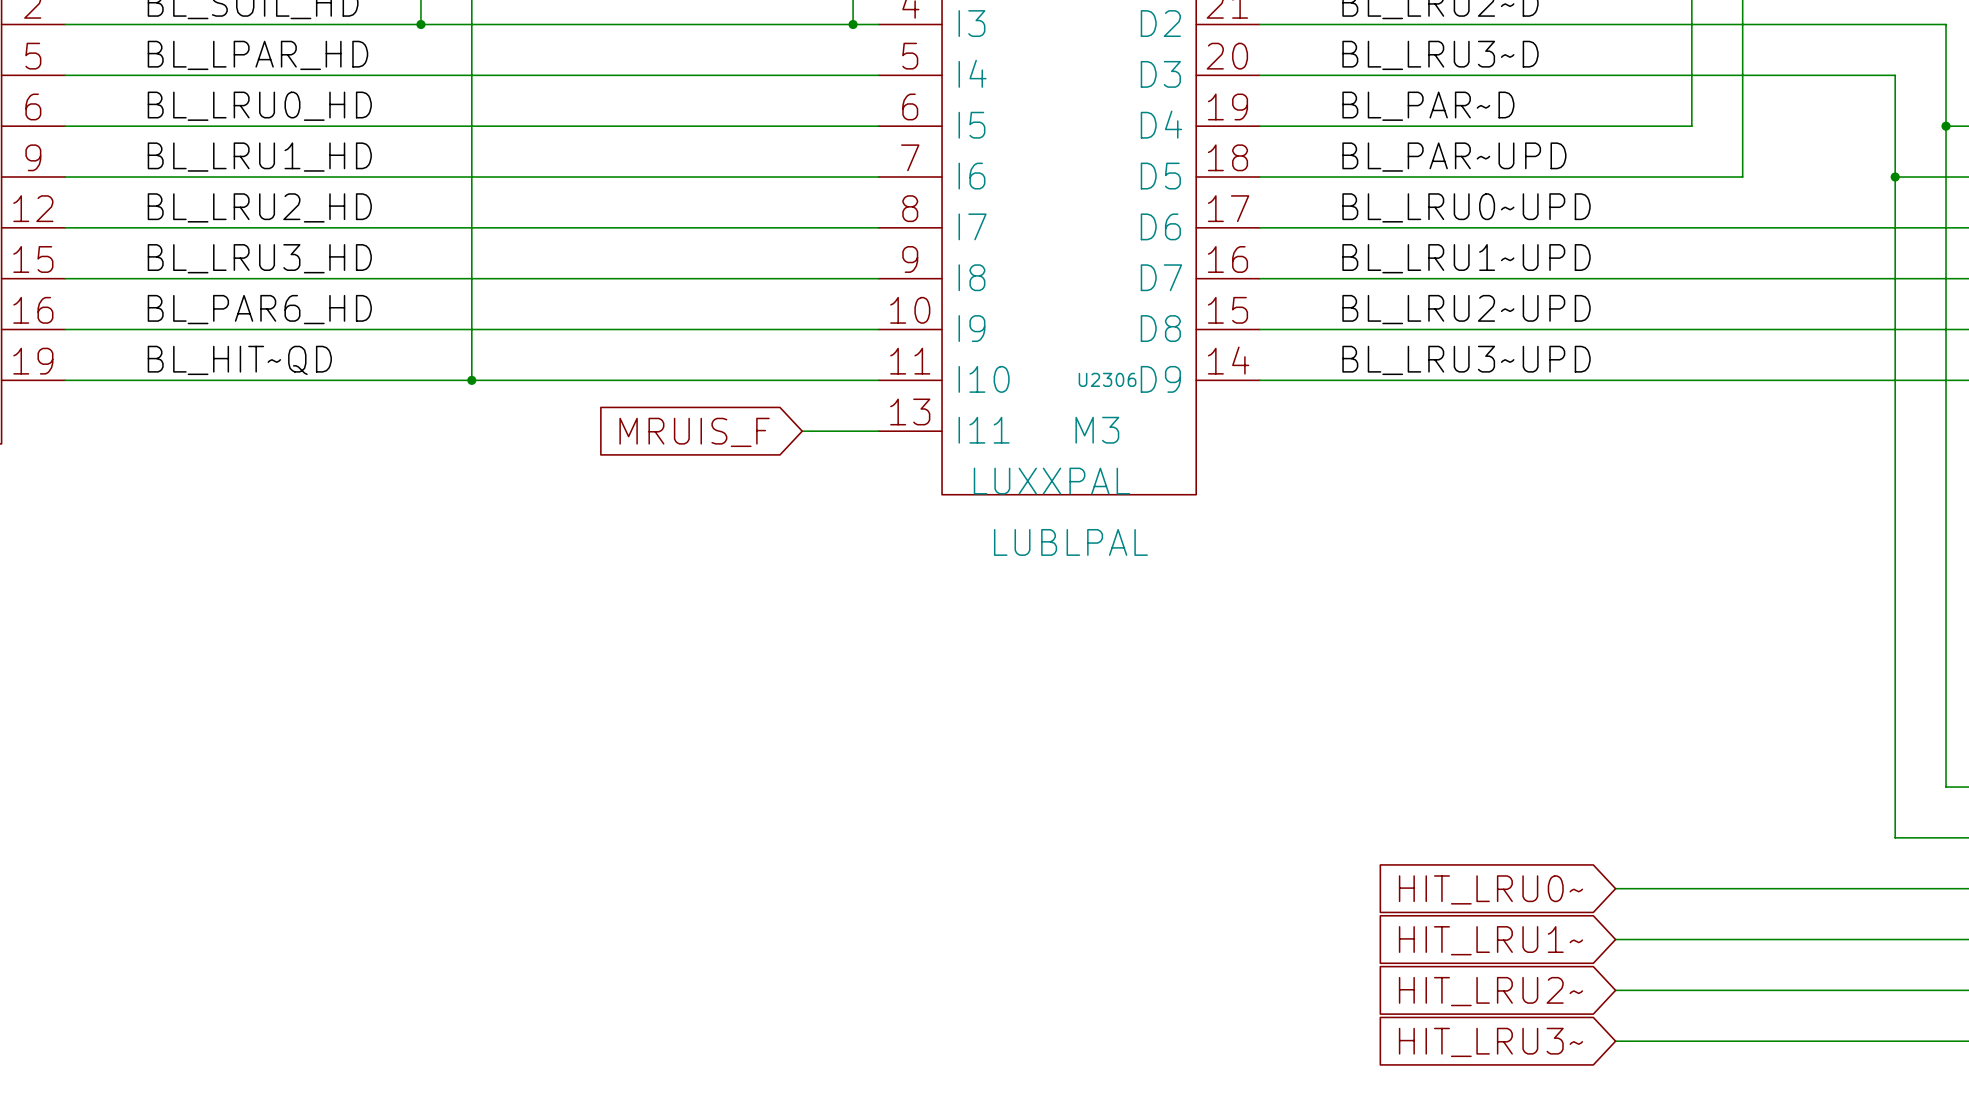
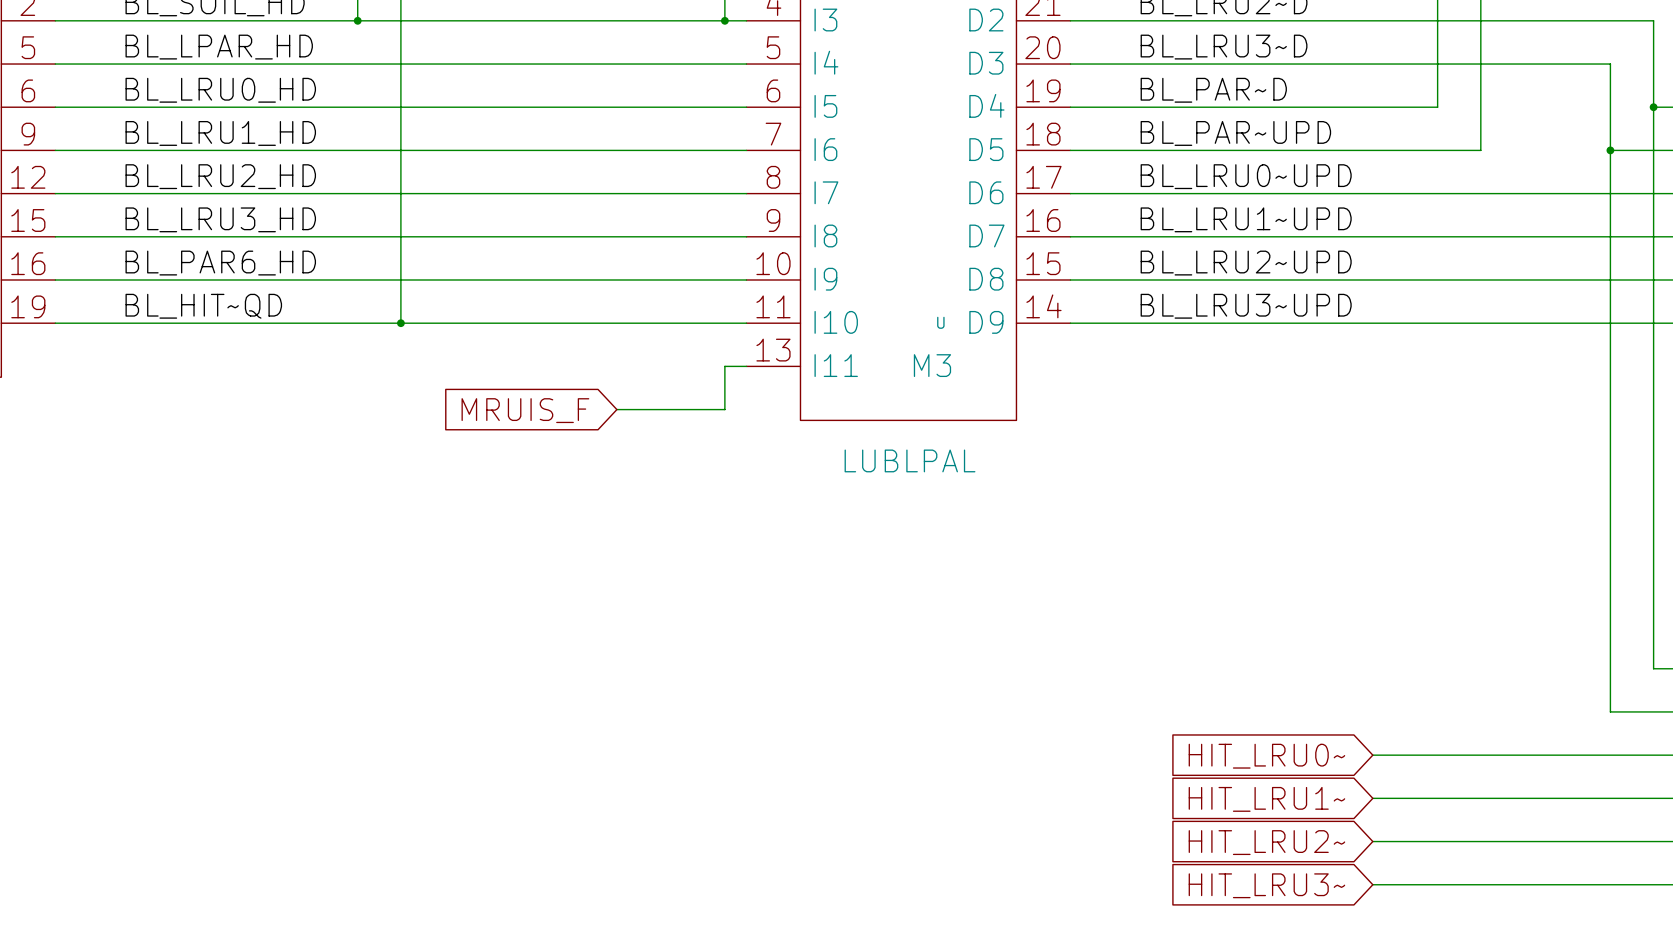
U2306 name: U2306 (1107, 379) -> U (940, 322)
wire: (802, 431) (853, 431) -> (616, 409) (724, 409) (724, 366)
global label position: MRUIS_F (694, 432) -> MRUIS_F (525, 410)
U2306 value: LUXXPAL (1051, 481) -> none

